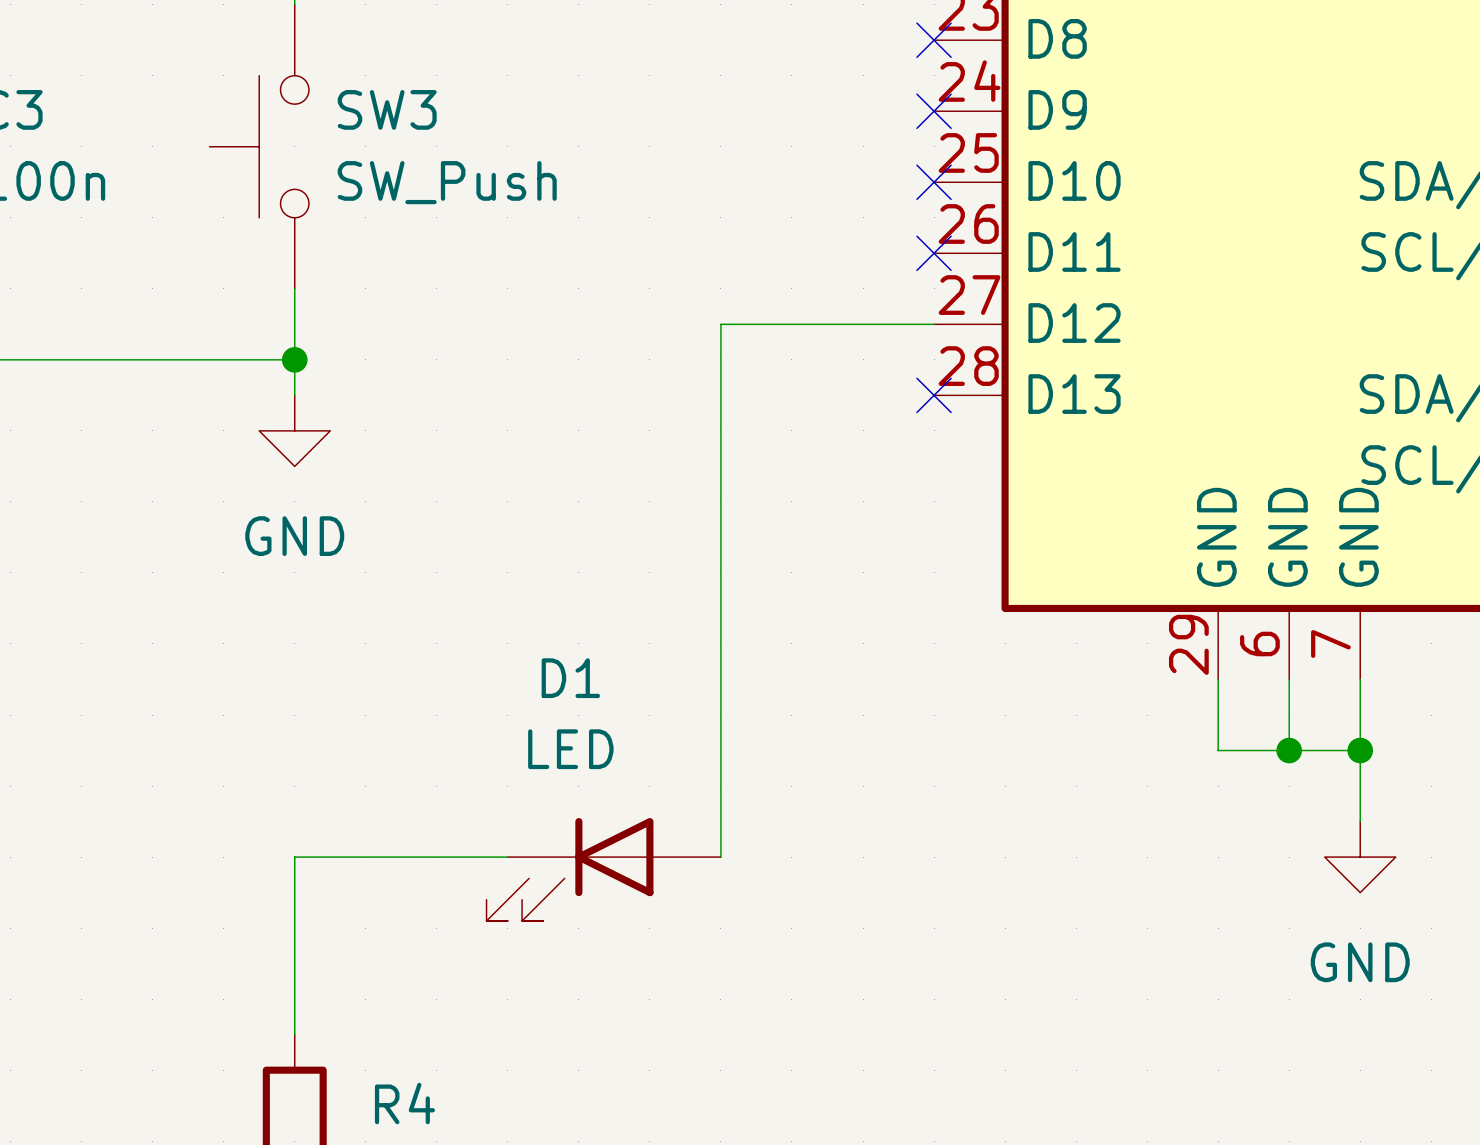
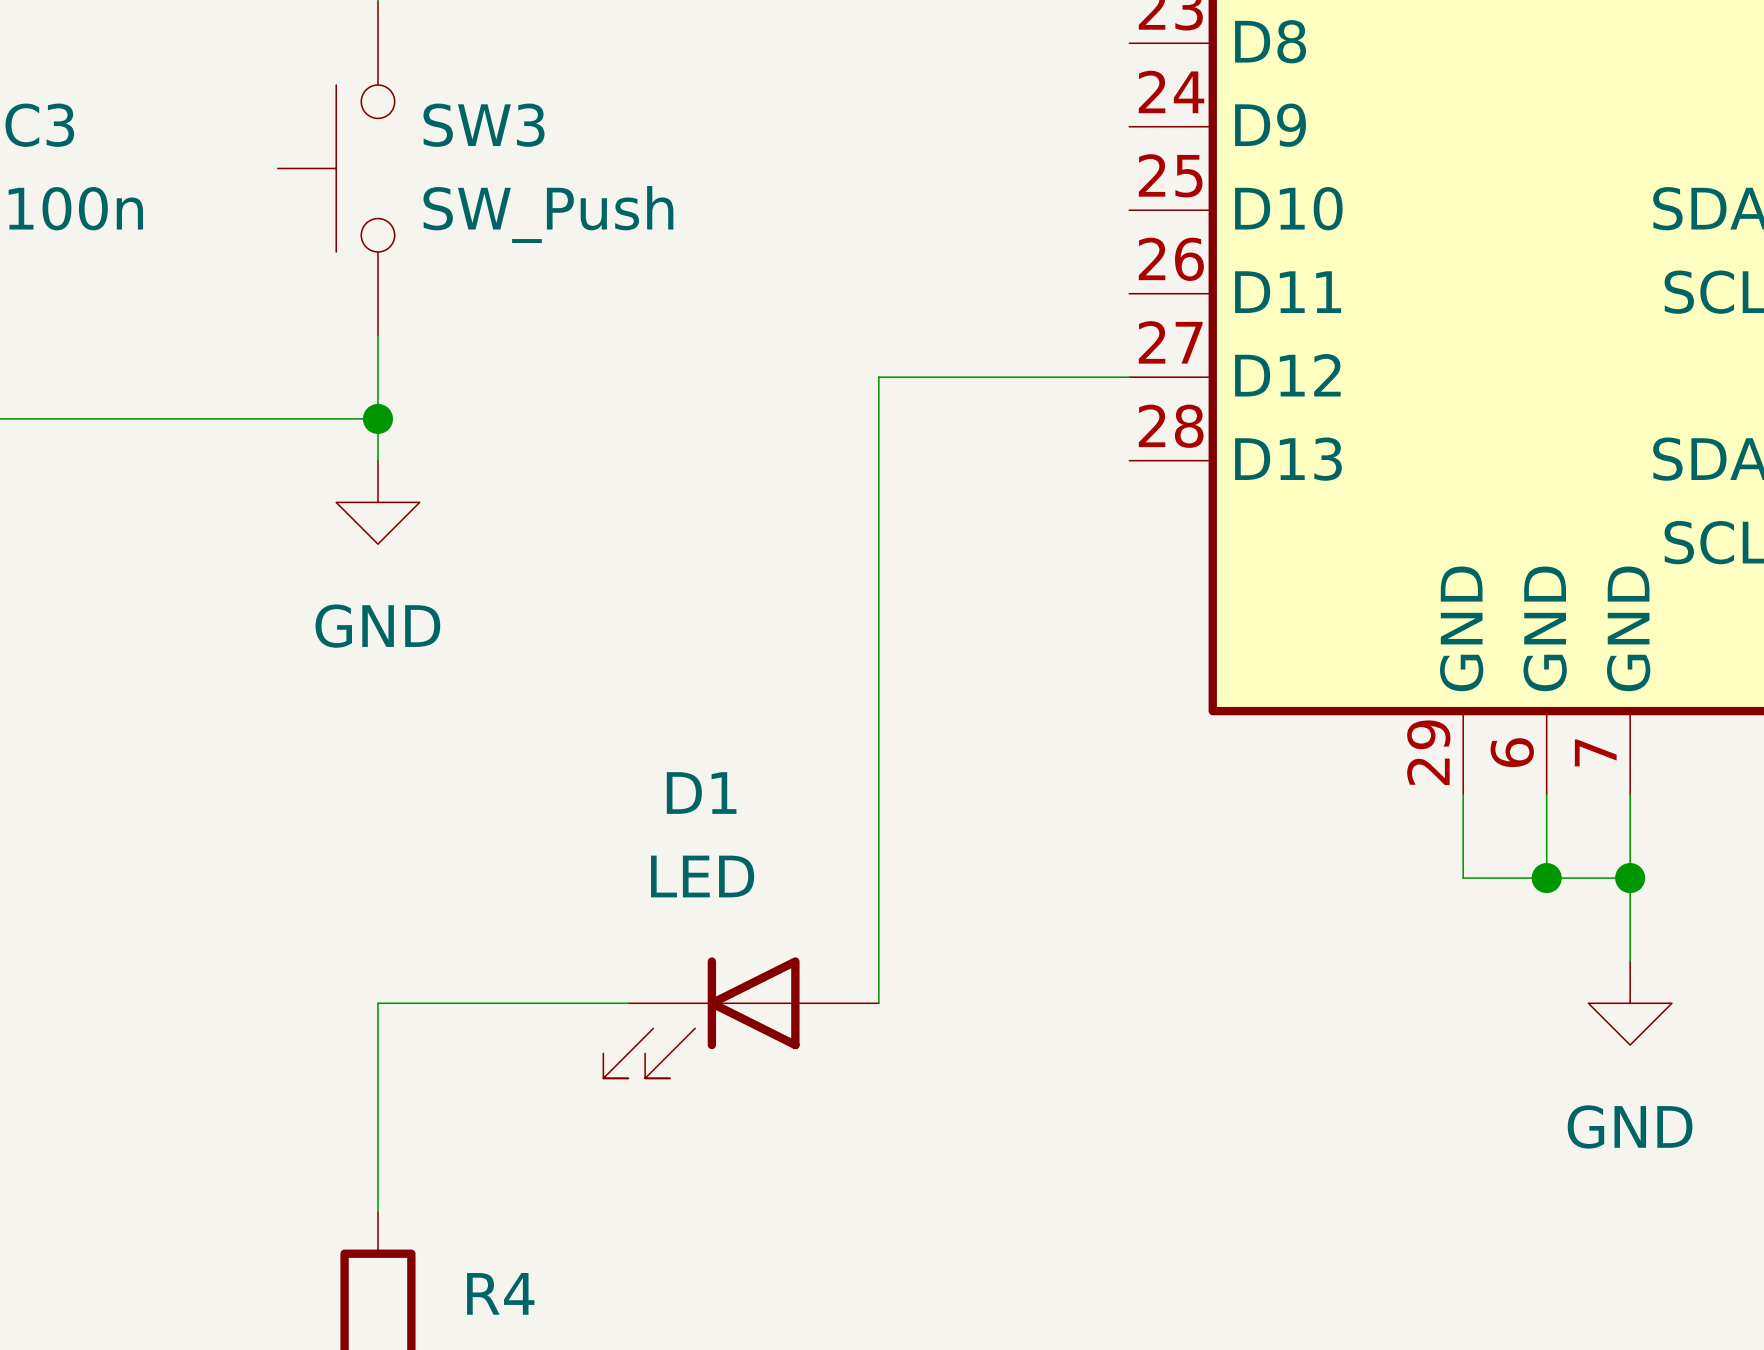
no-connect mark: (934, 40) -> none
no-connect mark: (934, 111) -> none
no-connect mark: (934, 182) -> none
no-connect mark: (934, 253) -> none
no-connect mark: (934, 395) -> none

